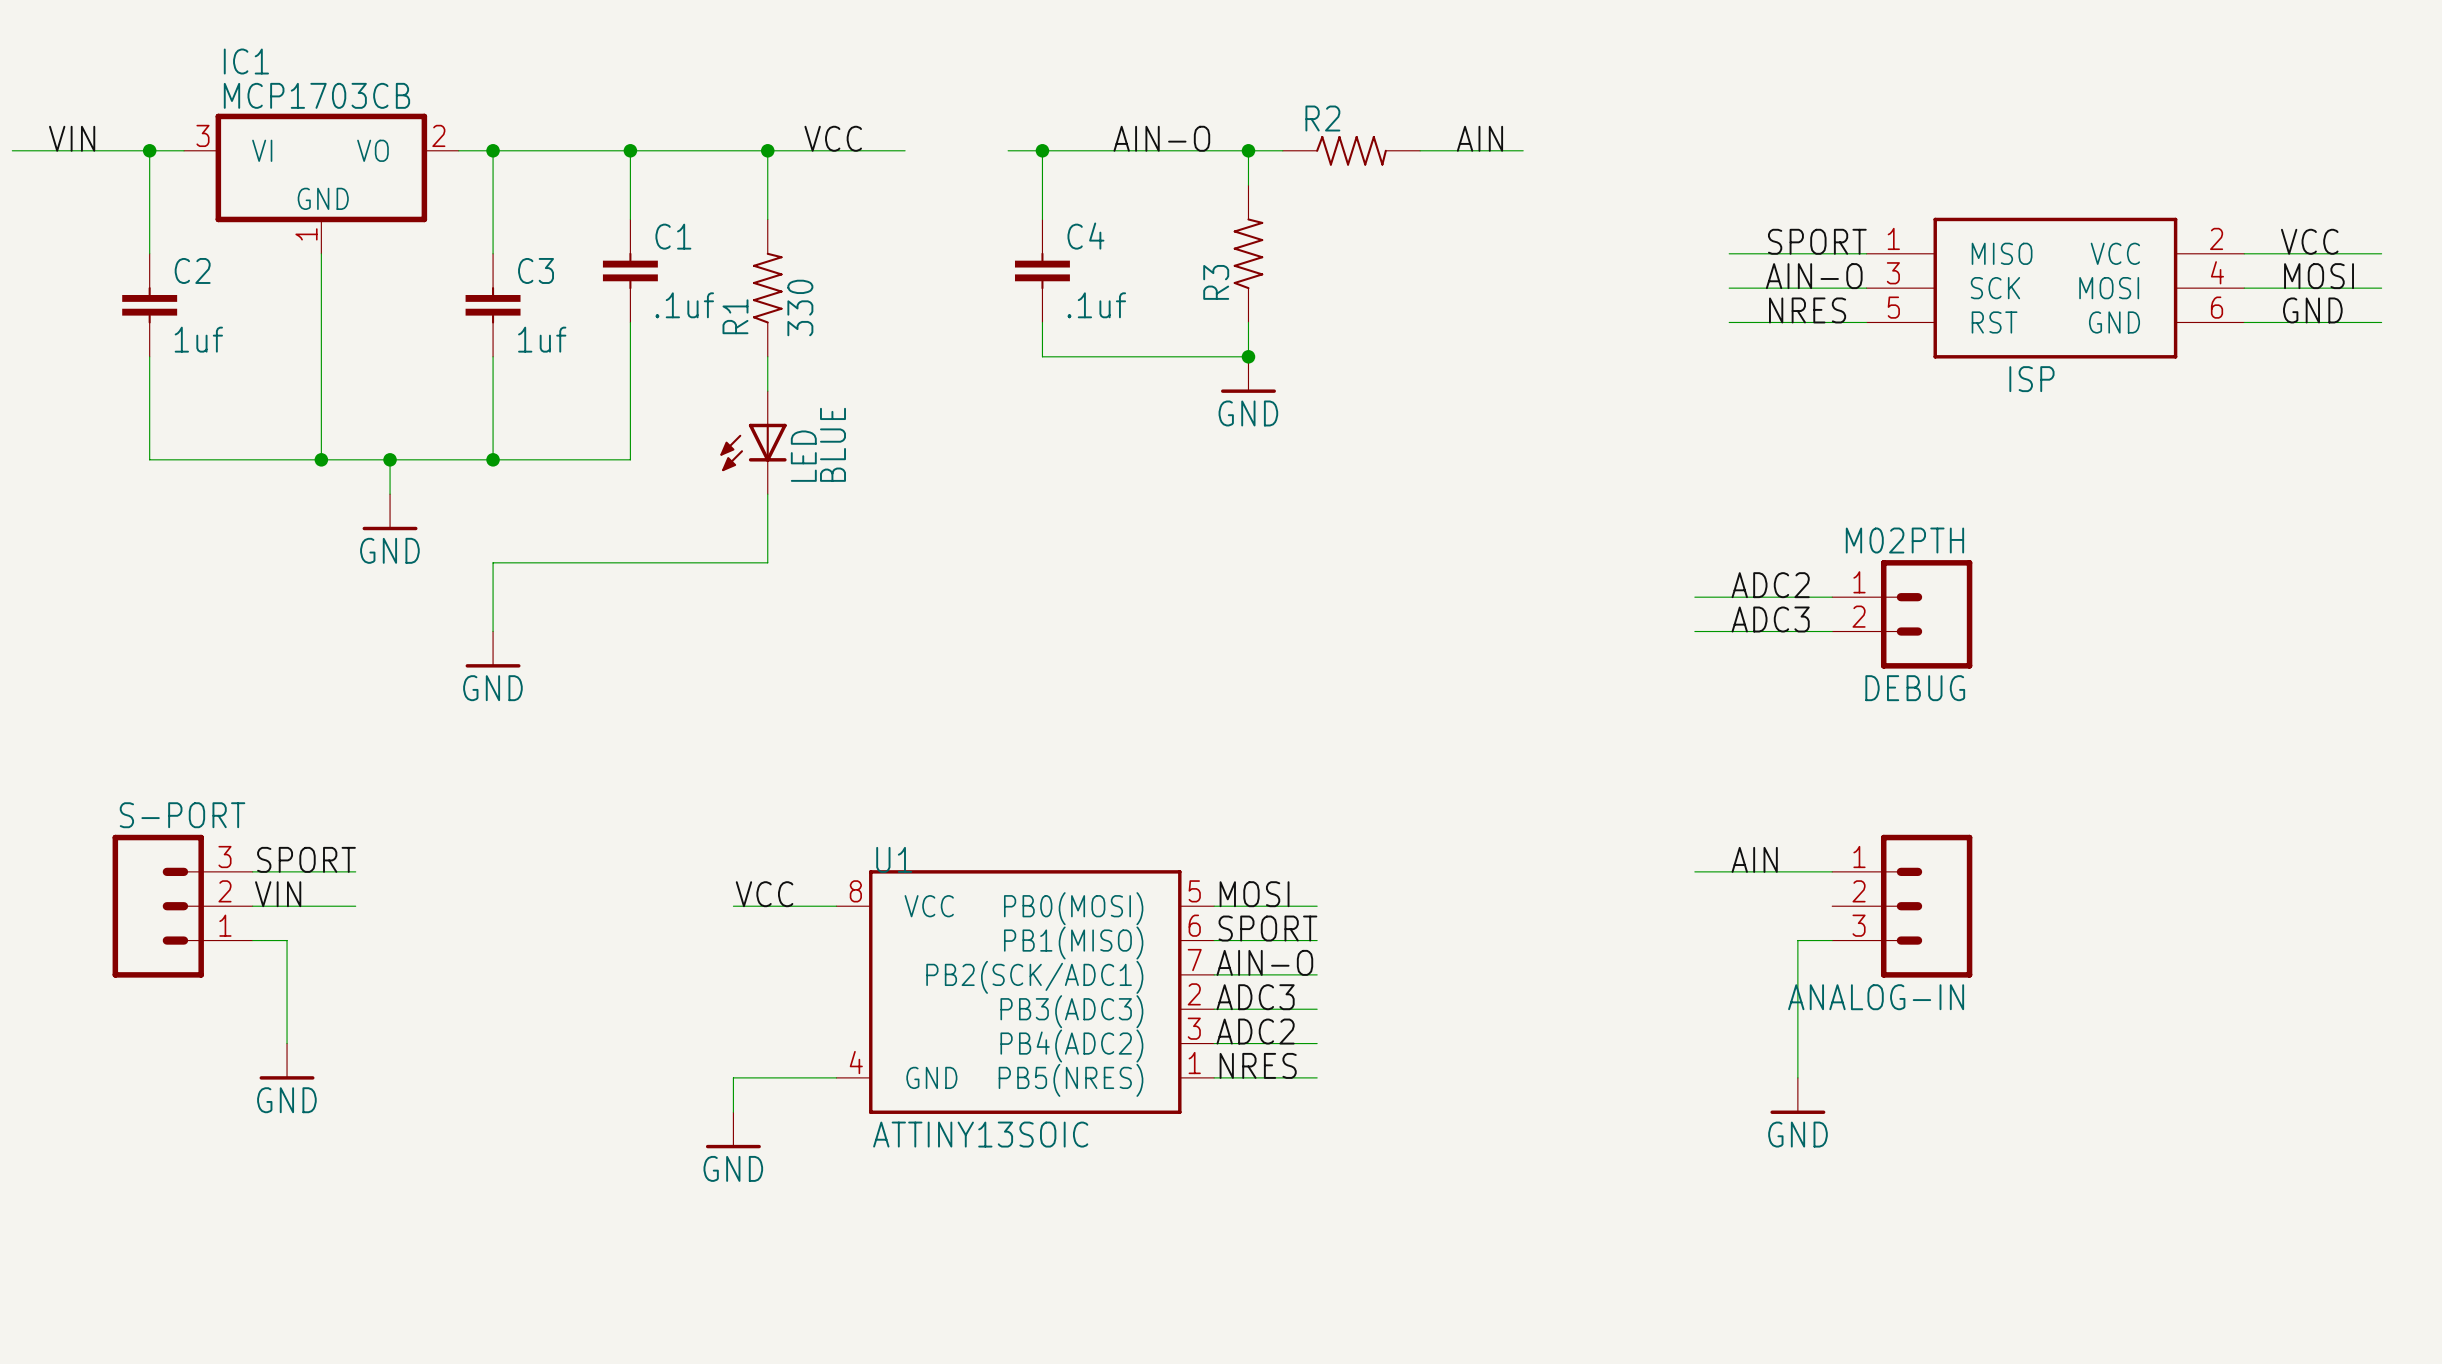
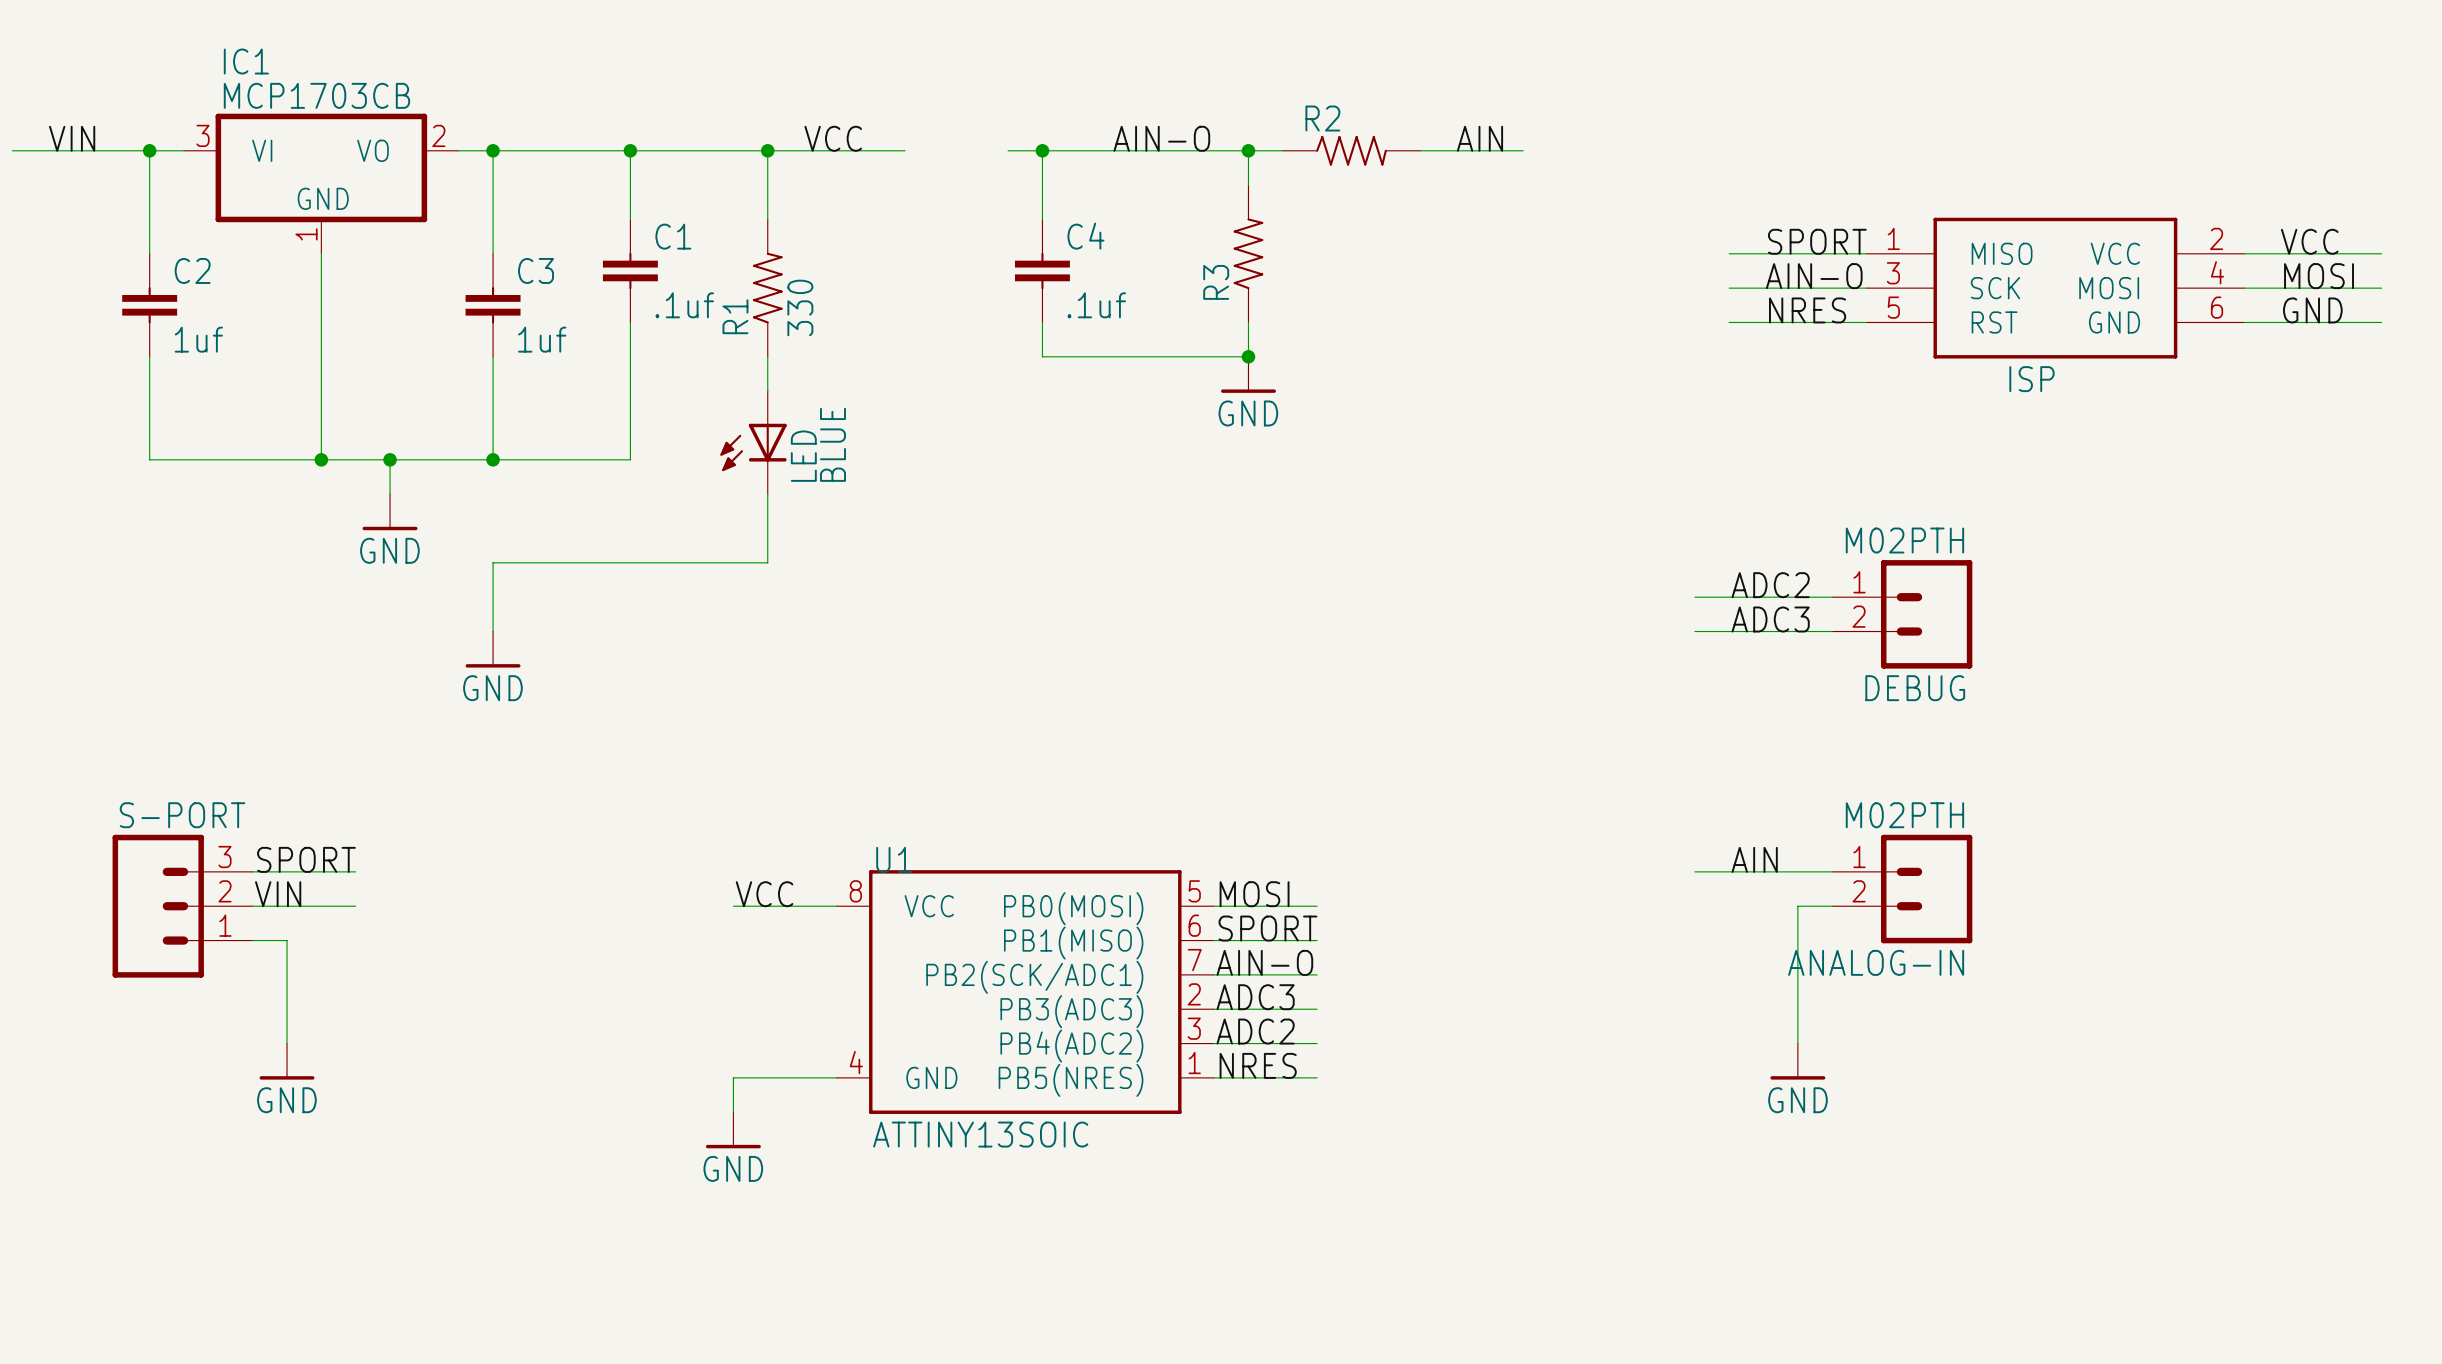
ANALOG-IN: none -> M02PTH (1902, 889)
ANALOG-IN: (1902, 906) -> none
wire: (1797, 940) (1832, 940) -> (1797, 940) (1797, 906) (1832, 906)
power symbol position: GND (1797, 1095) -> GND (1797, 1061)

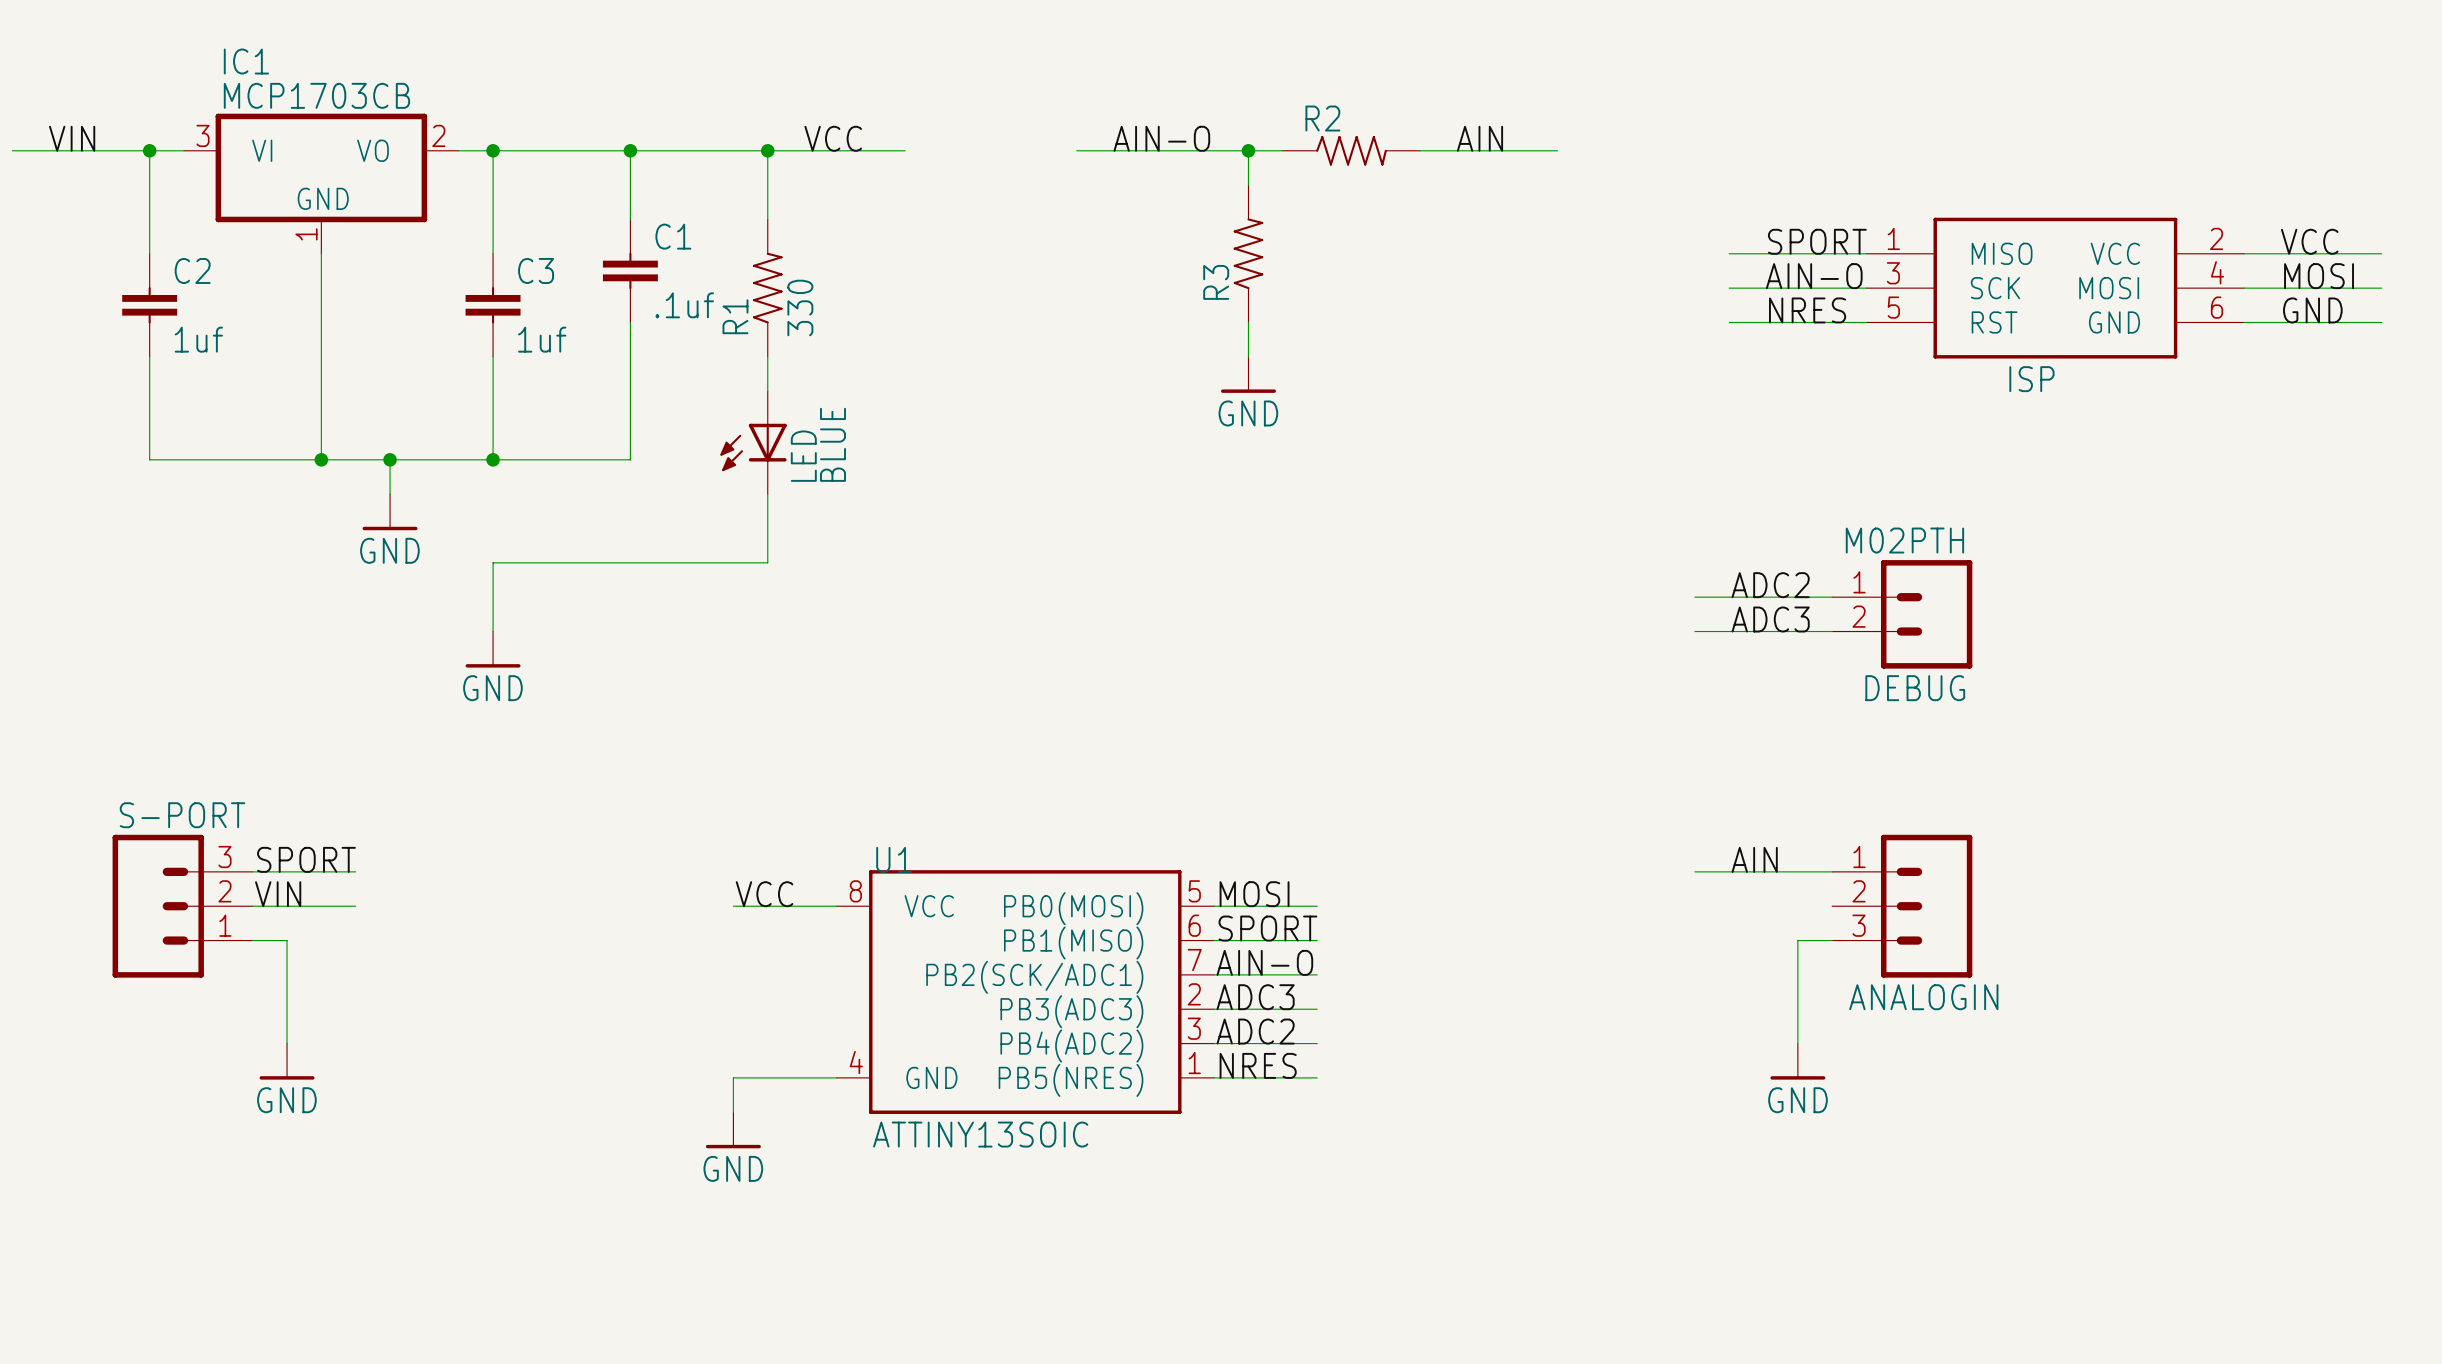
wire: (1008, 150) (1076, 150) -> none
wire: (1042, 150) (1042, 219) -> none
junction: (1042, 150) -> none
wire: none -> (1523, 150) (1557, 150)
C4: .1uf (1042, 270) -> none
wire: (1042, 322) (1042, 356) (1248, 356) -> none
junction: (1248, 356) -> none
ANALOG-IN: M02PTH (1902, 889) -> none
wire: (1832, 906) (1797, 906) (1797, 940) -> (1832, 940) (1797, 940)
ANALOGIN: none -> (1902, 906)

